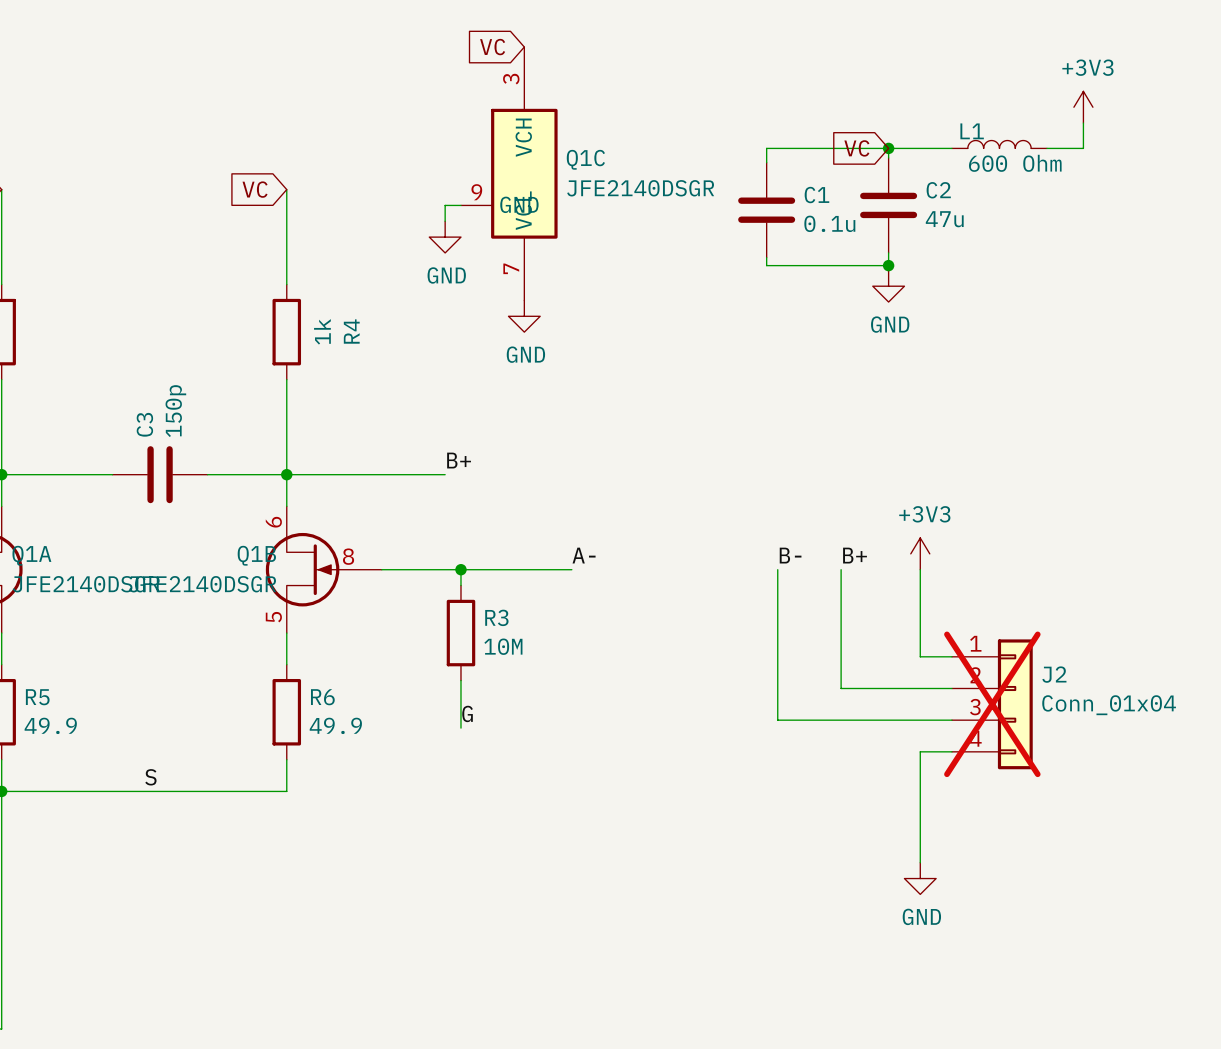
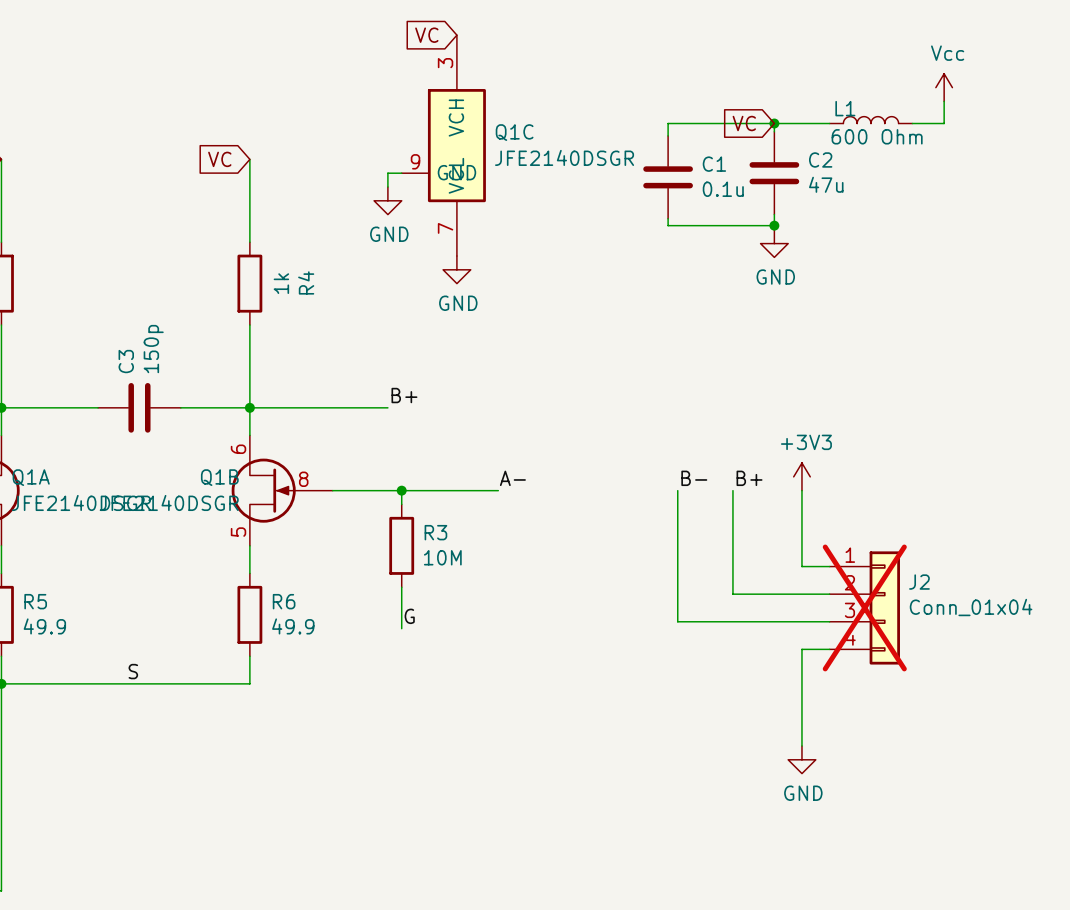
power symbol: +3V3 (1083, 107) -> Vcc (944, 87)

